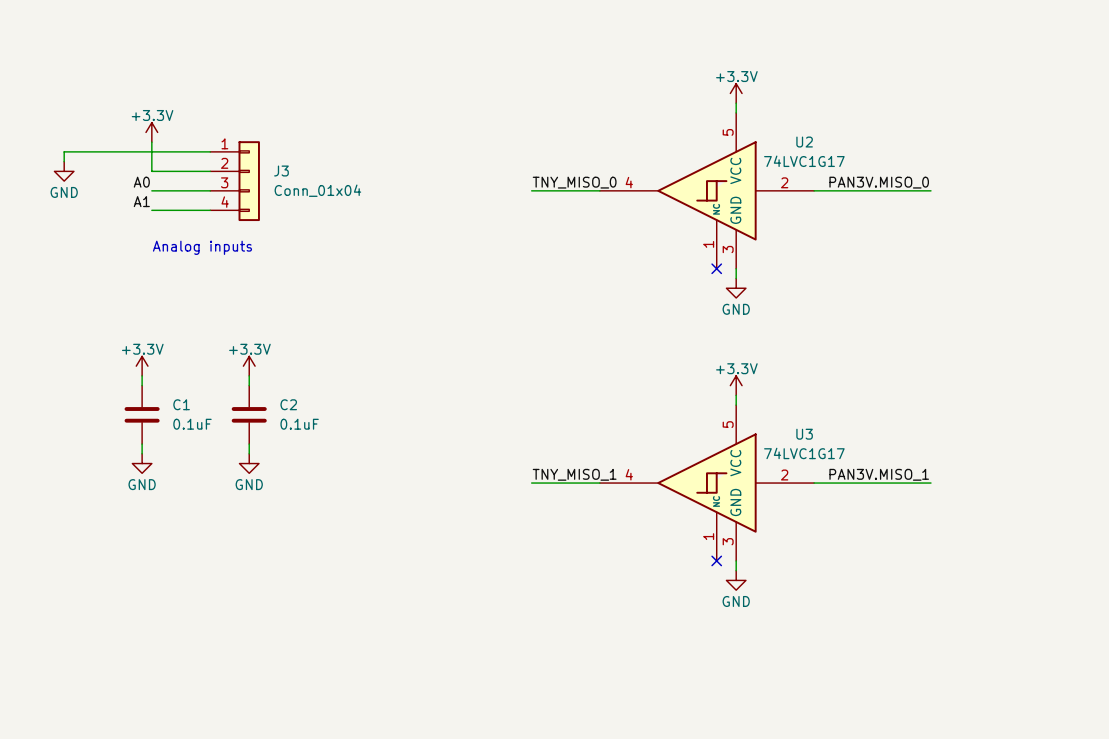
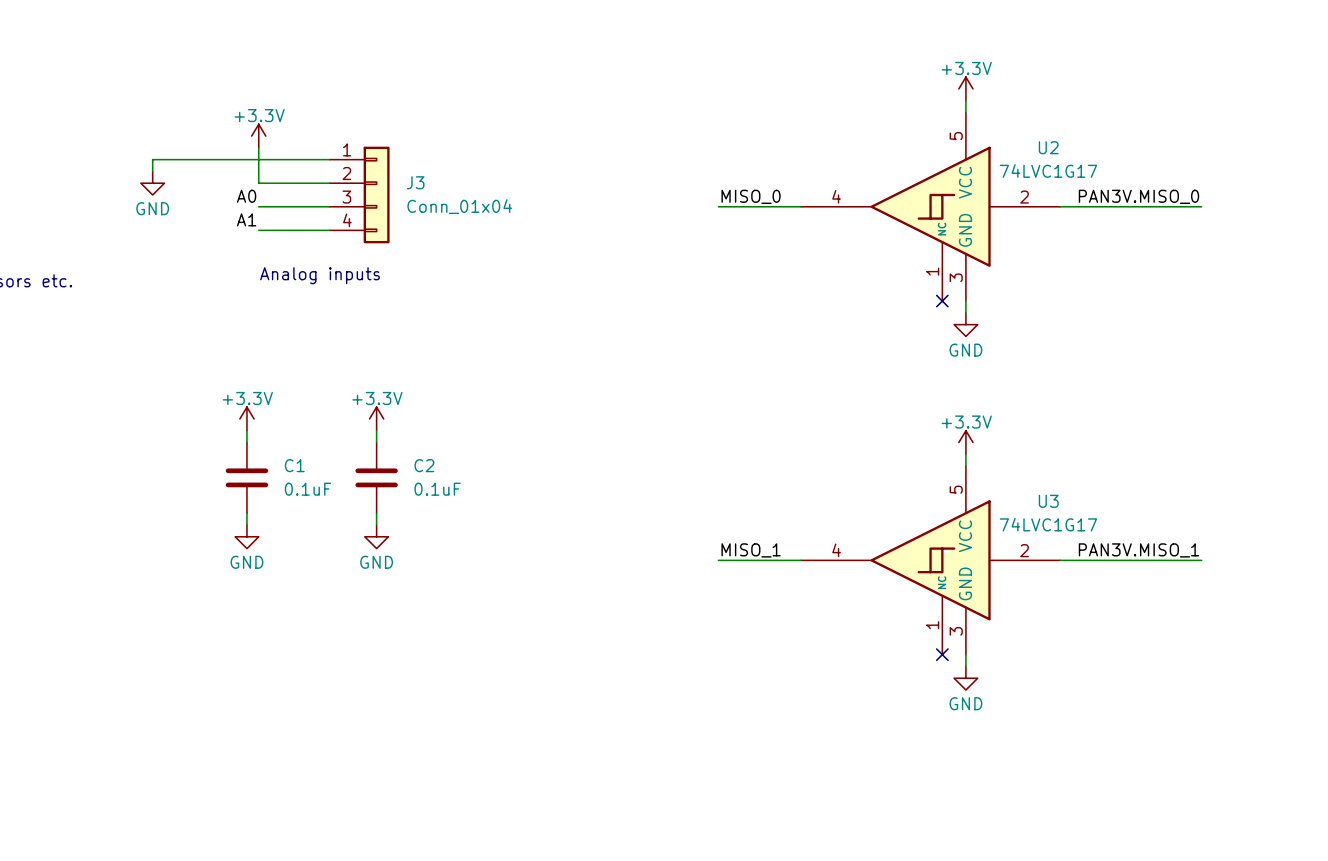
label: TNY_MISO_0 (574, 182) -> MISO_0 (751, 196)
label: TNY_MISO_1 (574, 474) -> MISO_1 (751, 550)

